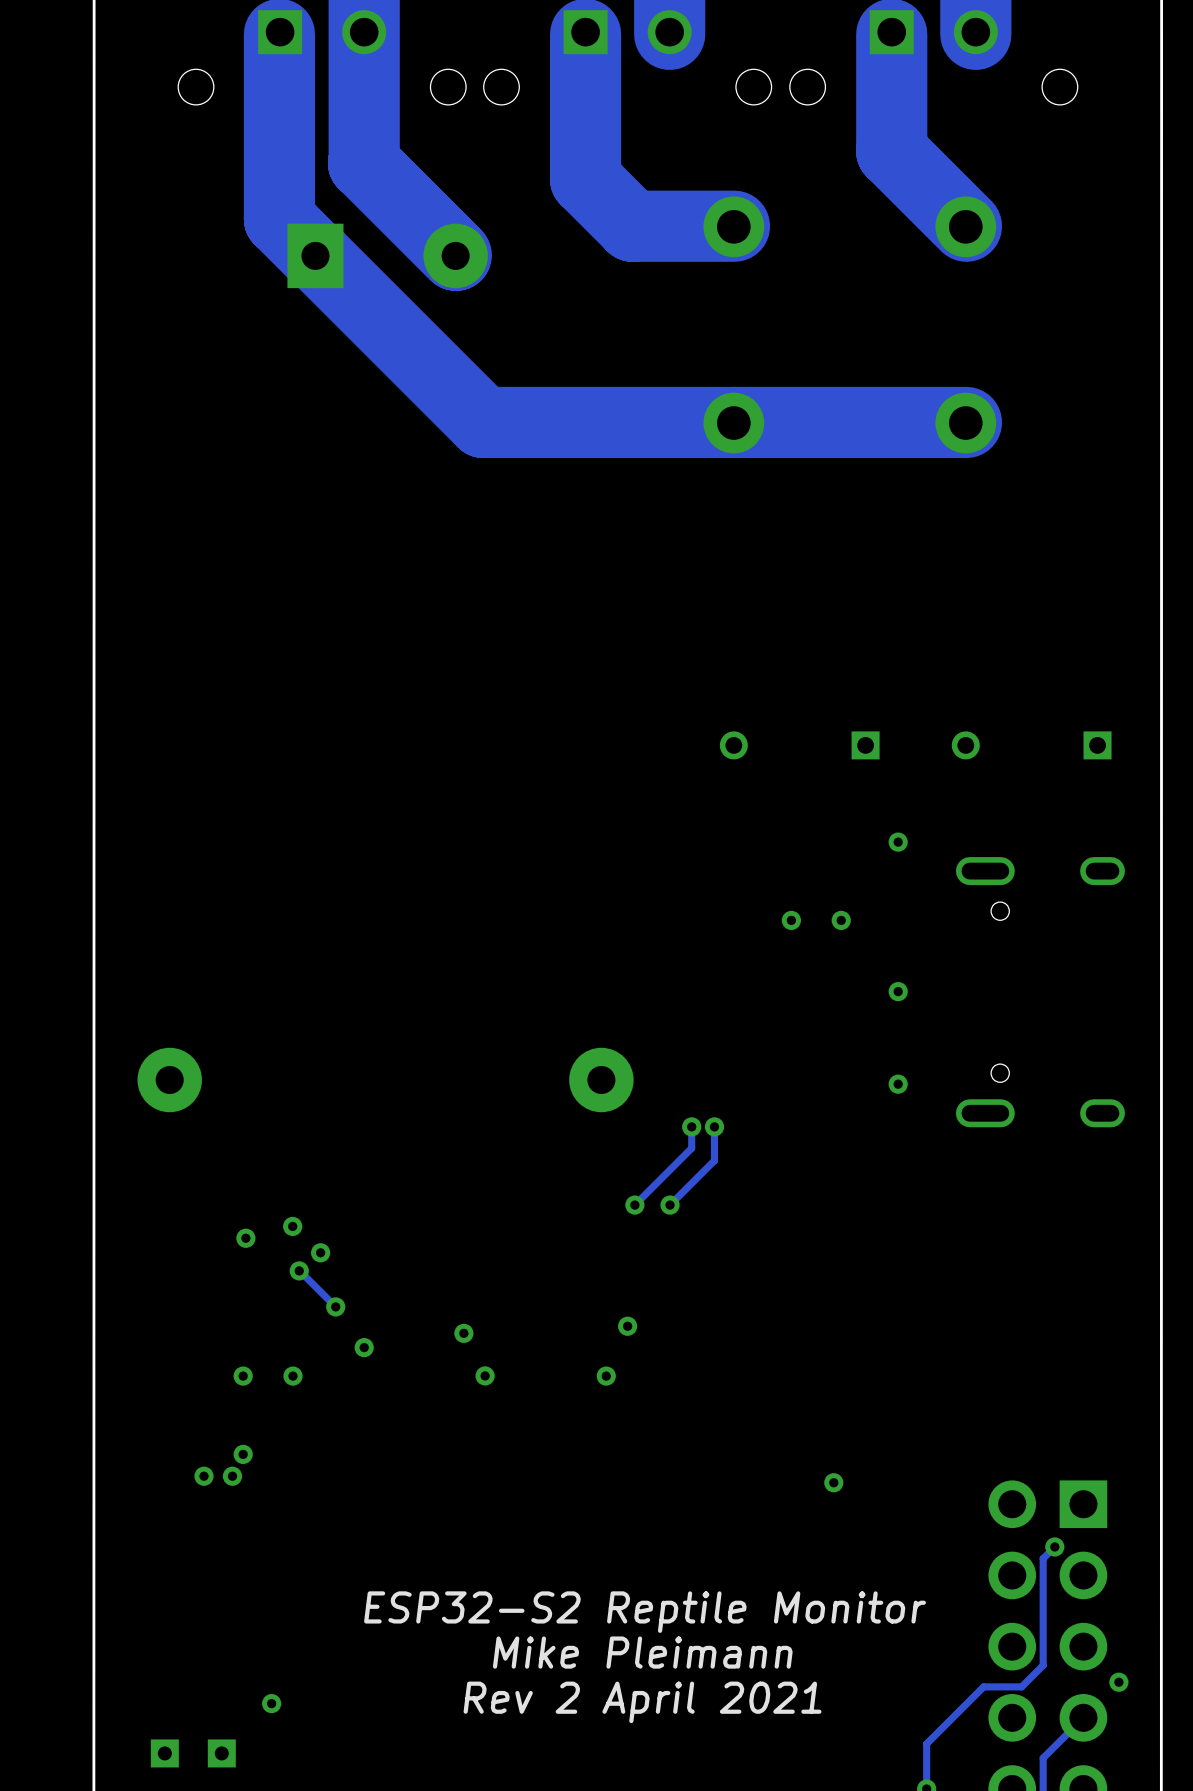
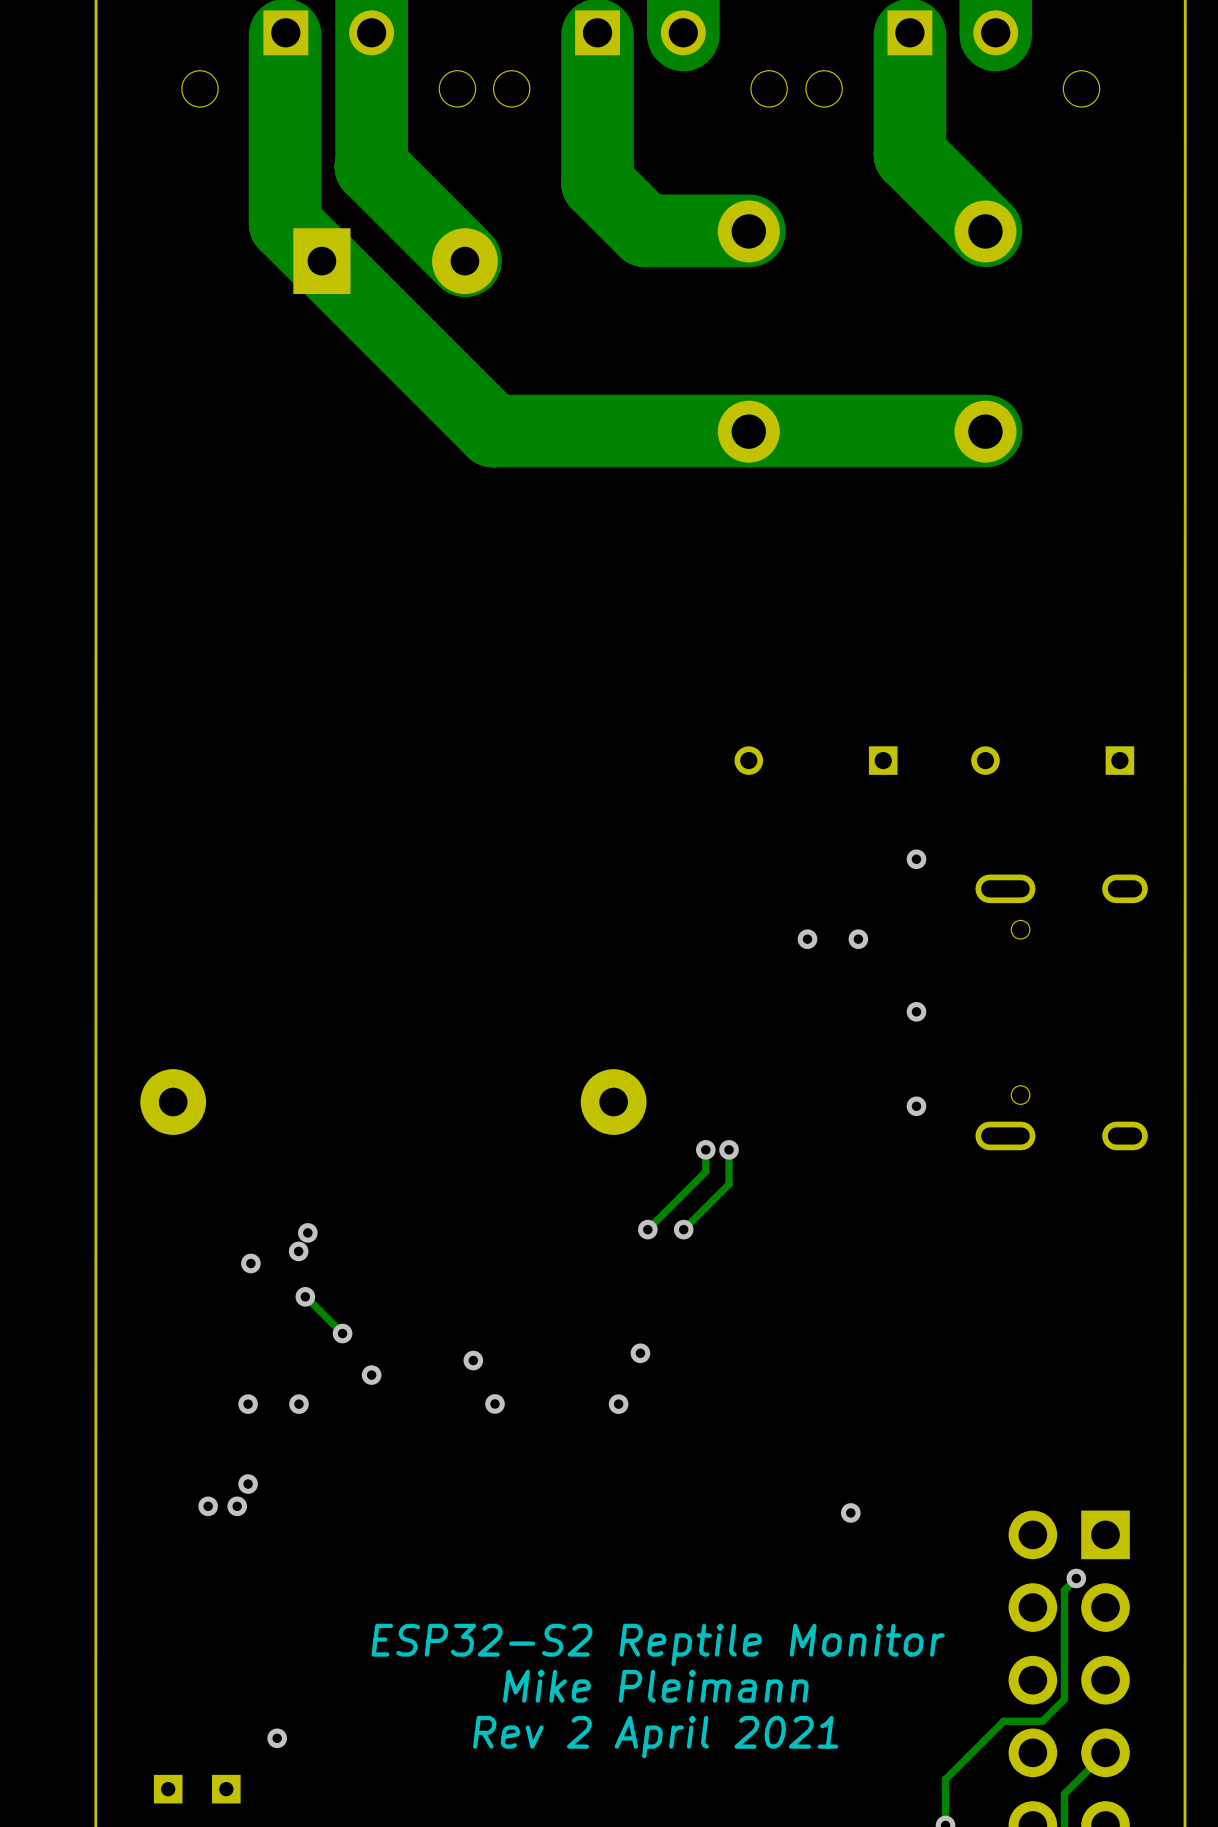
via position: (320, 1252) -> (307, 1232)
via: (1118, 1682) -> none

